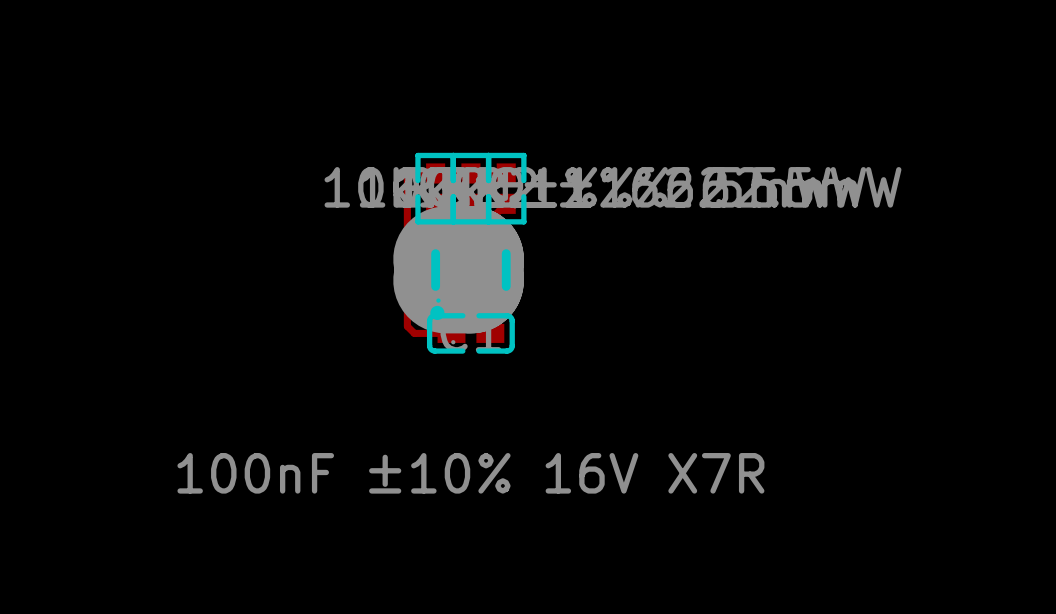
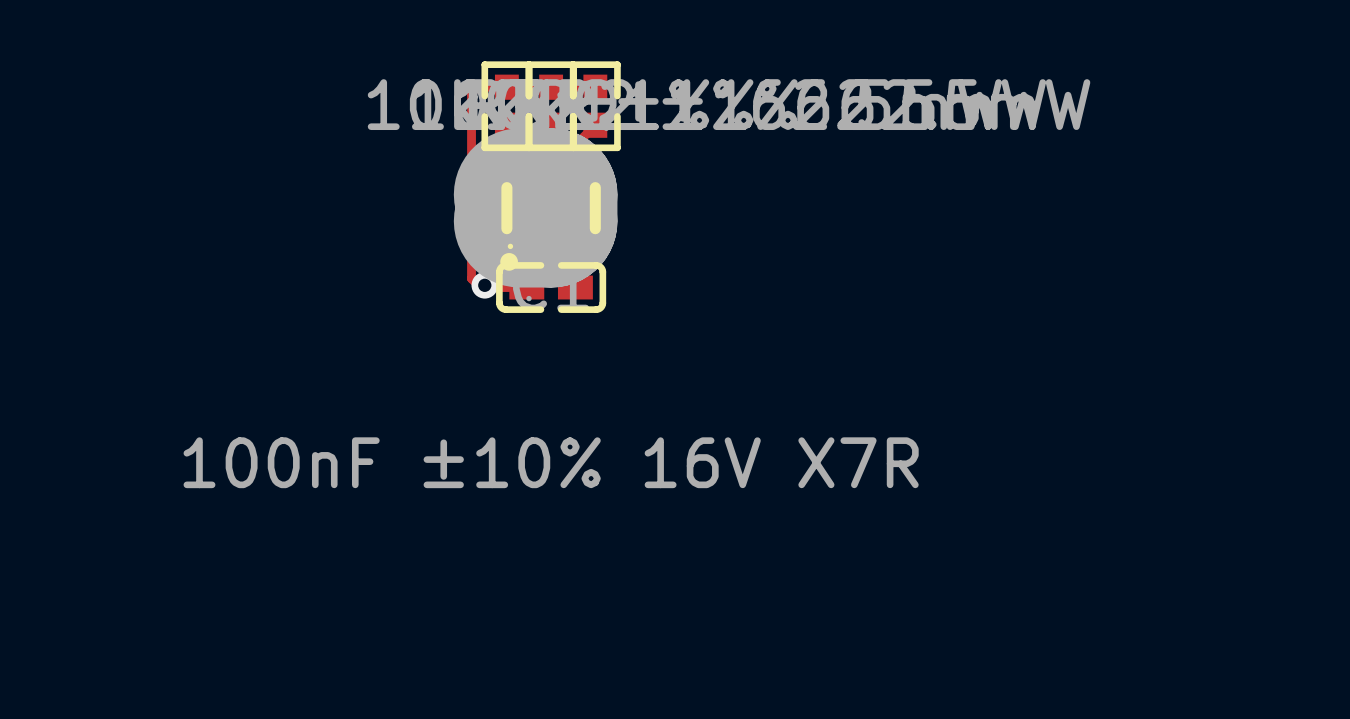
via: none -> (484, 285)

